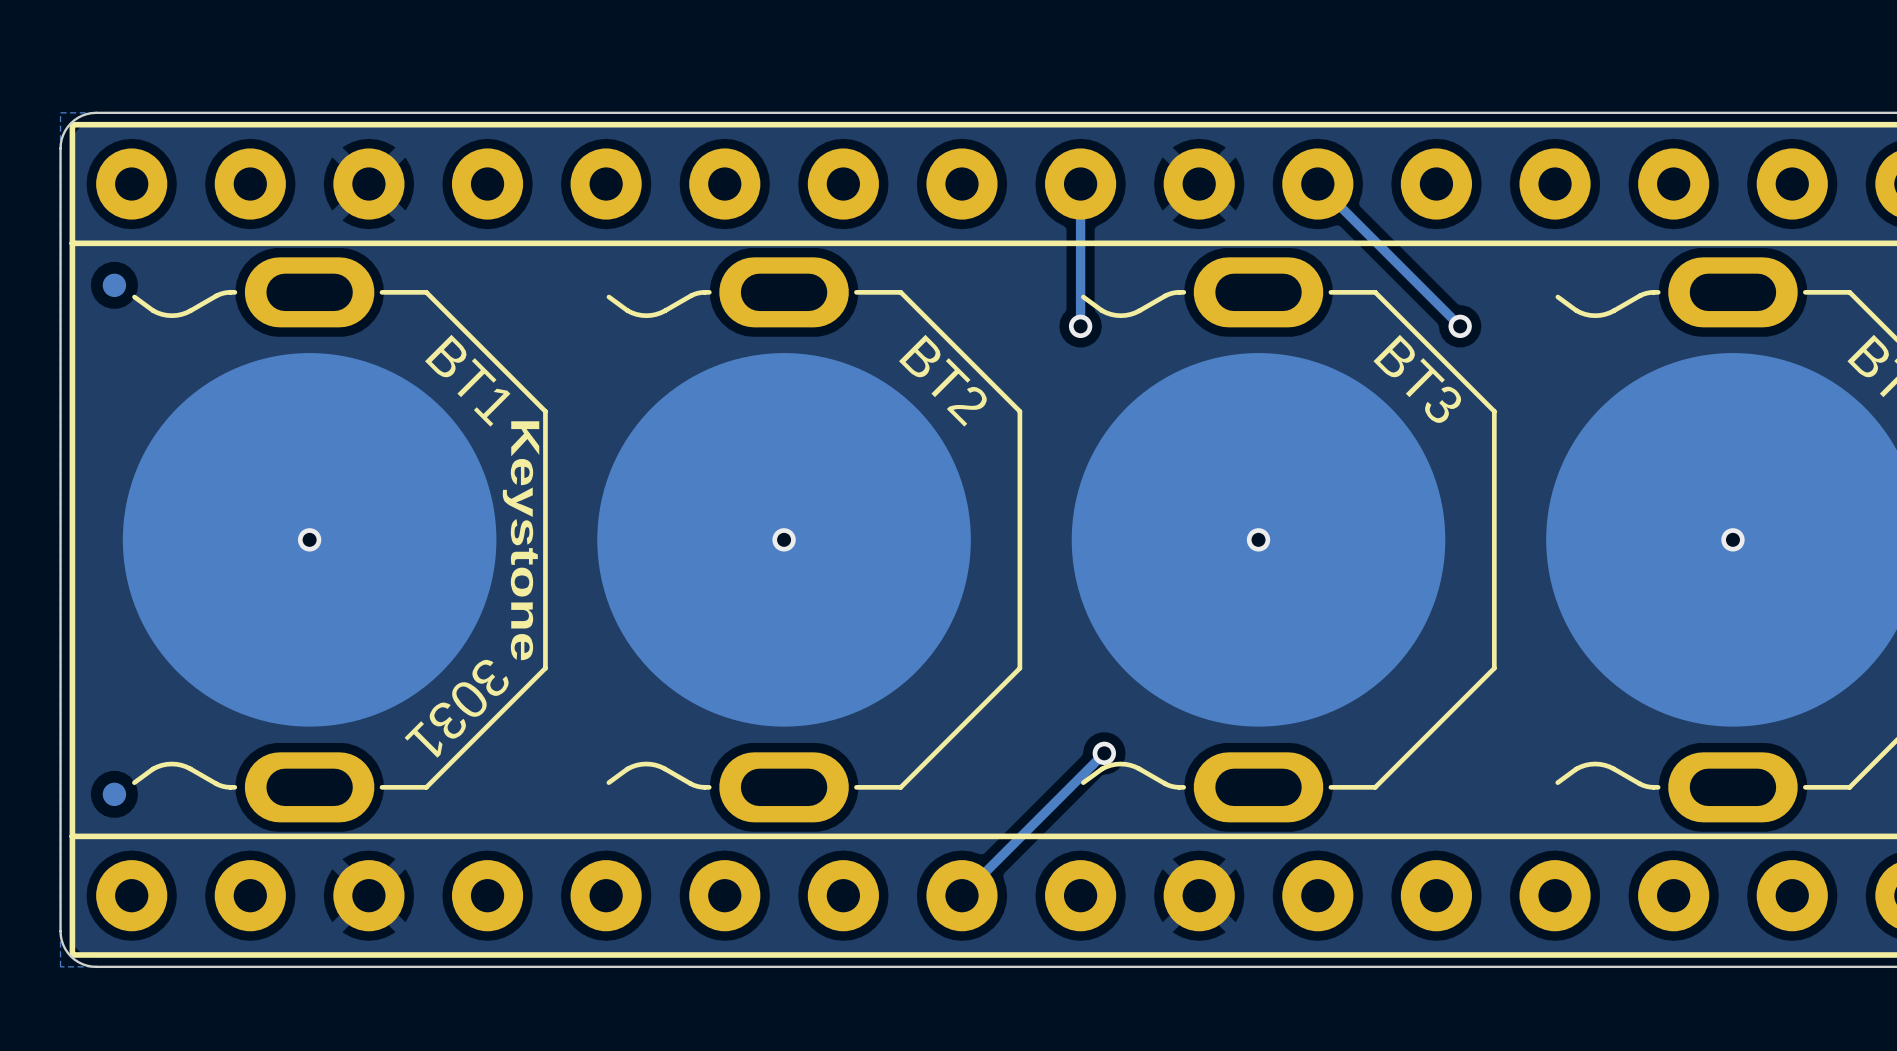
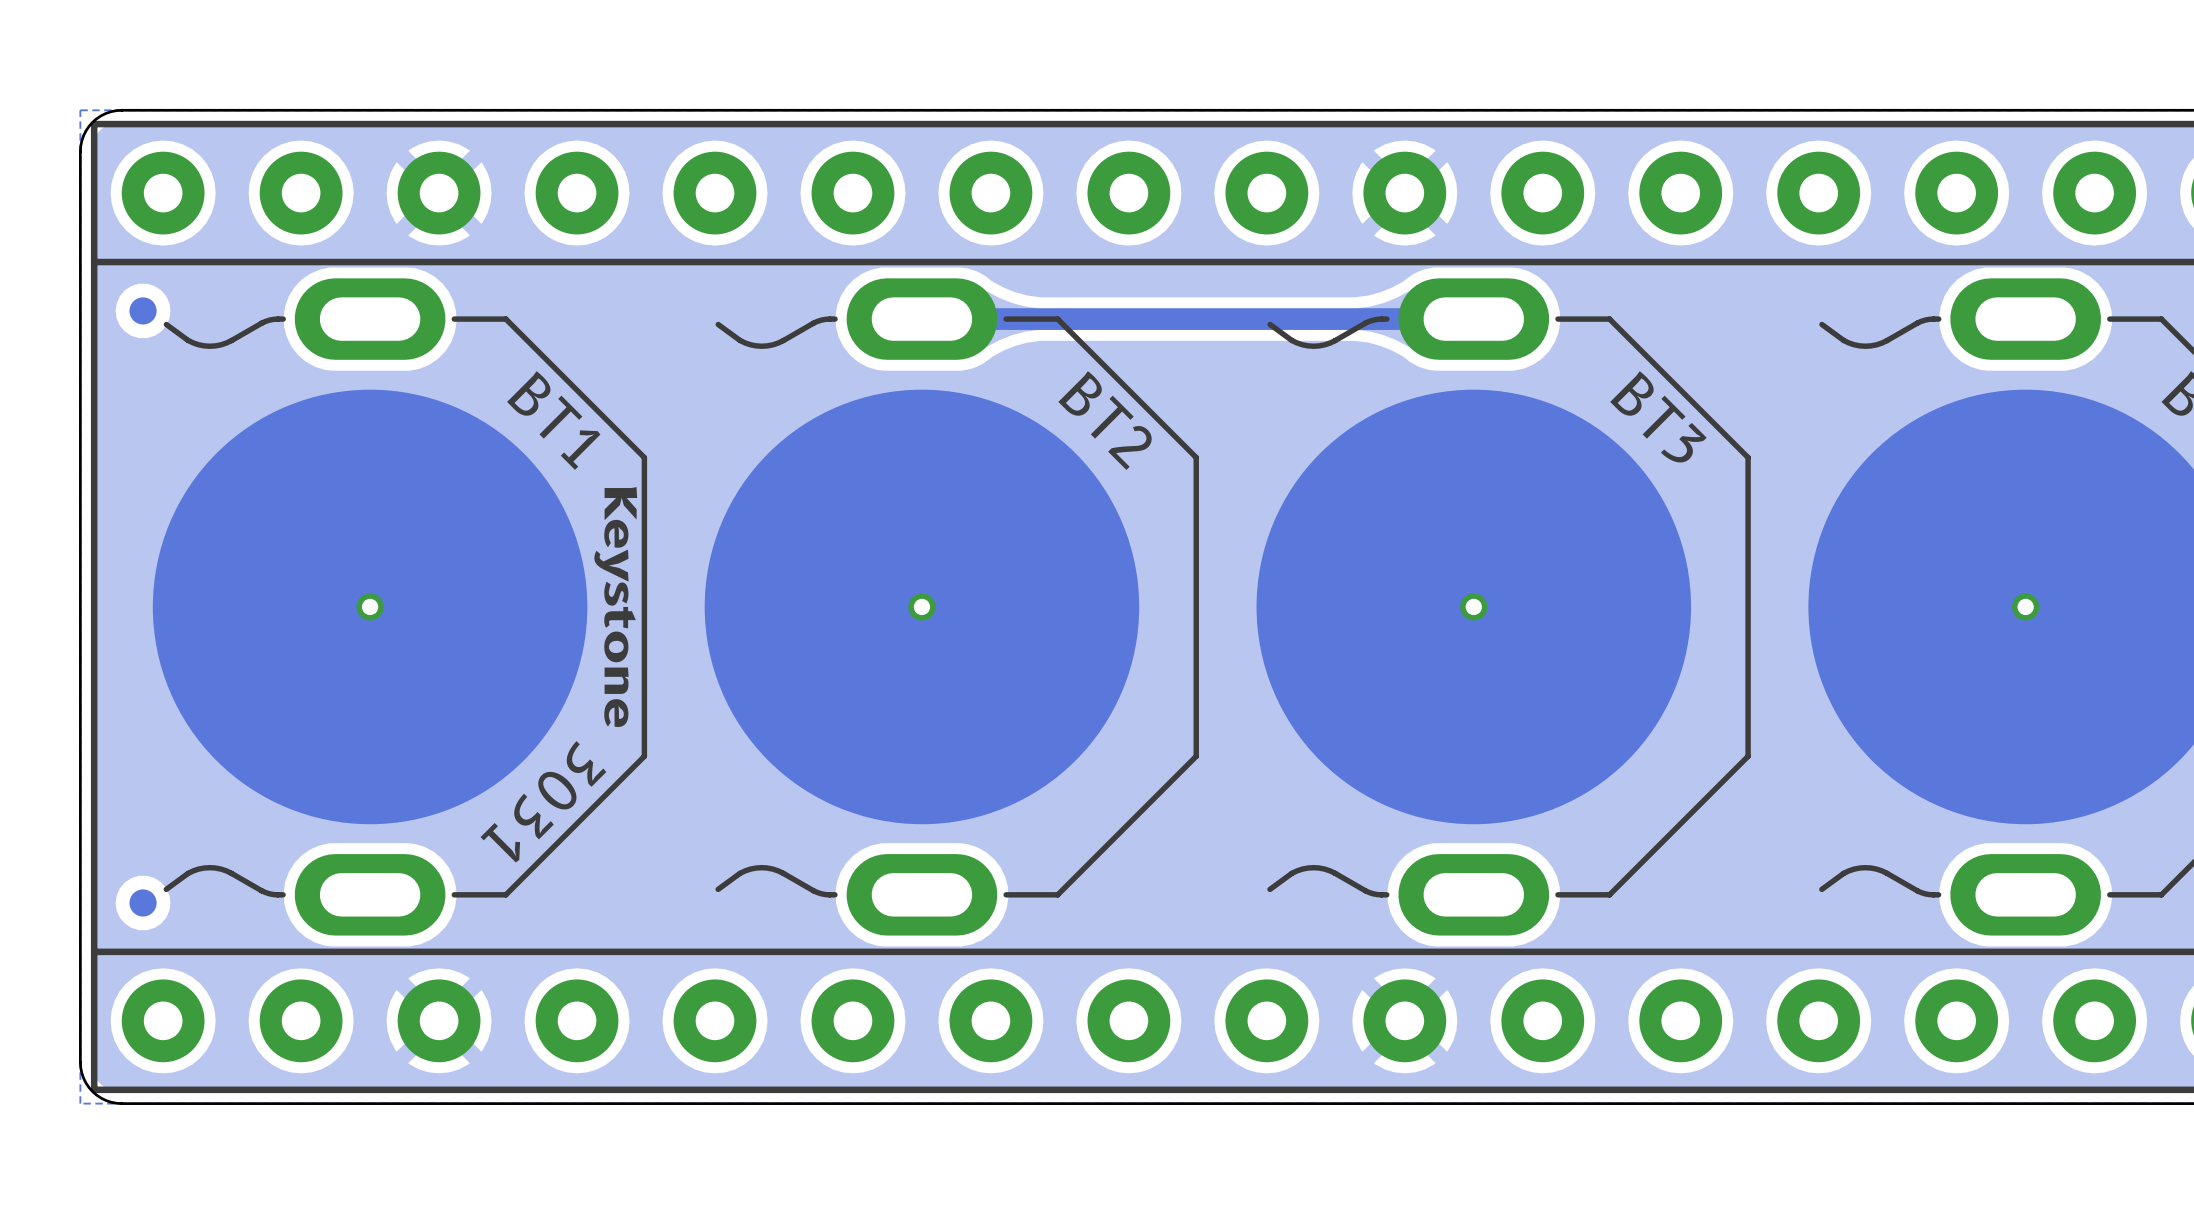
track: (1080, 184) (1080, 326) -> none
track: (1317, 184) (1460, 326) -> none
track: none -> (1473, 319) (921, 319)
via: (1080, 326) -> none
via: (1460, 326) -> none
track: (1104, 753) (961, 895) -> none
via: (1104, 753) -> none

